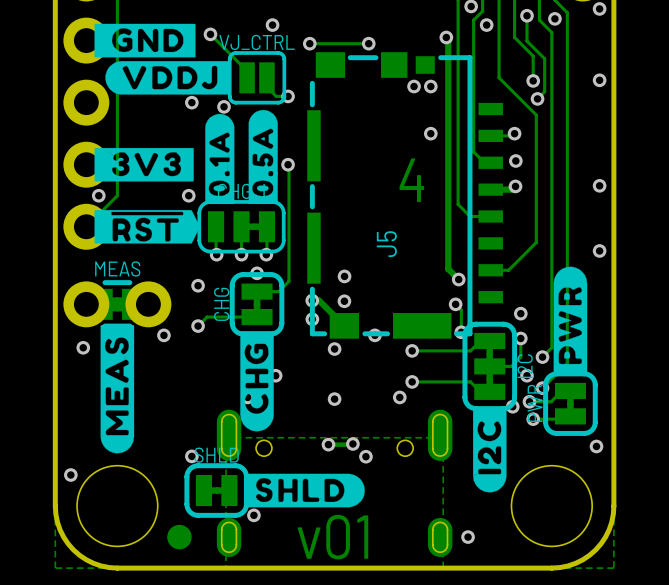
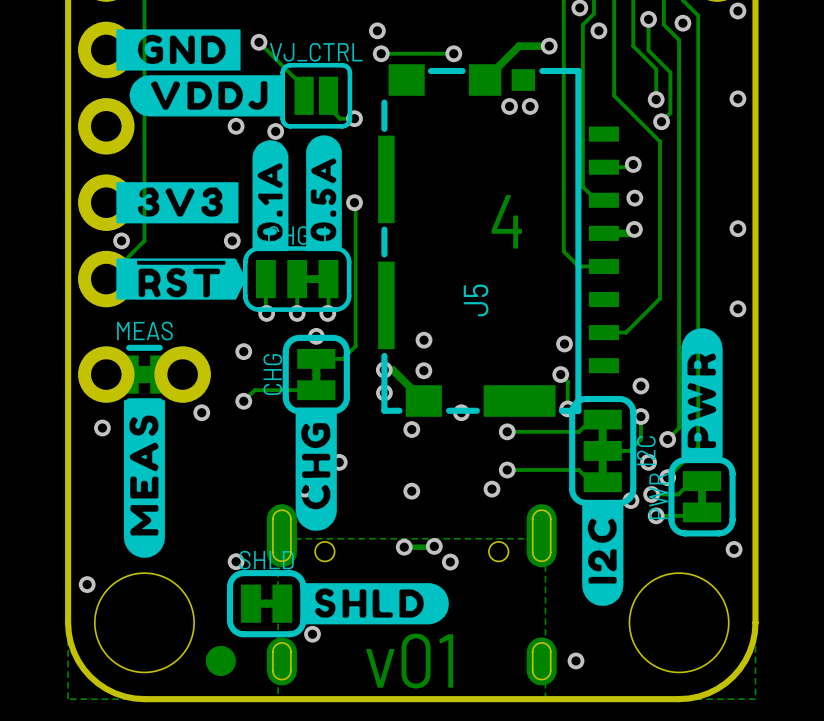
via position: (272, 25) -> (377, 30)
track: (446, 37) (448, 39) (448, 269) (458, 279) -> (549, 46) (519, 46) (485, 80)
via: (430, 133) -> none

